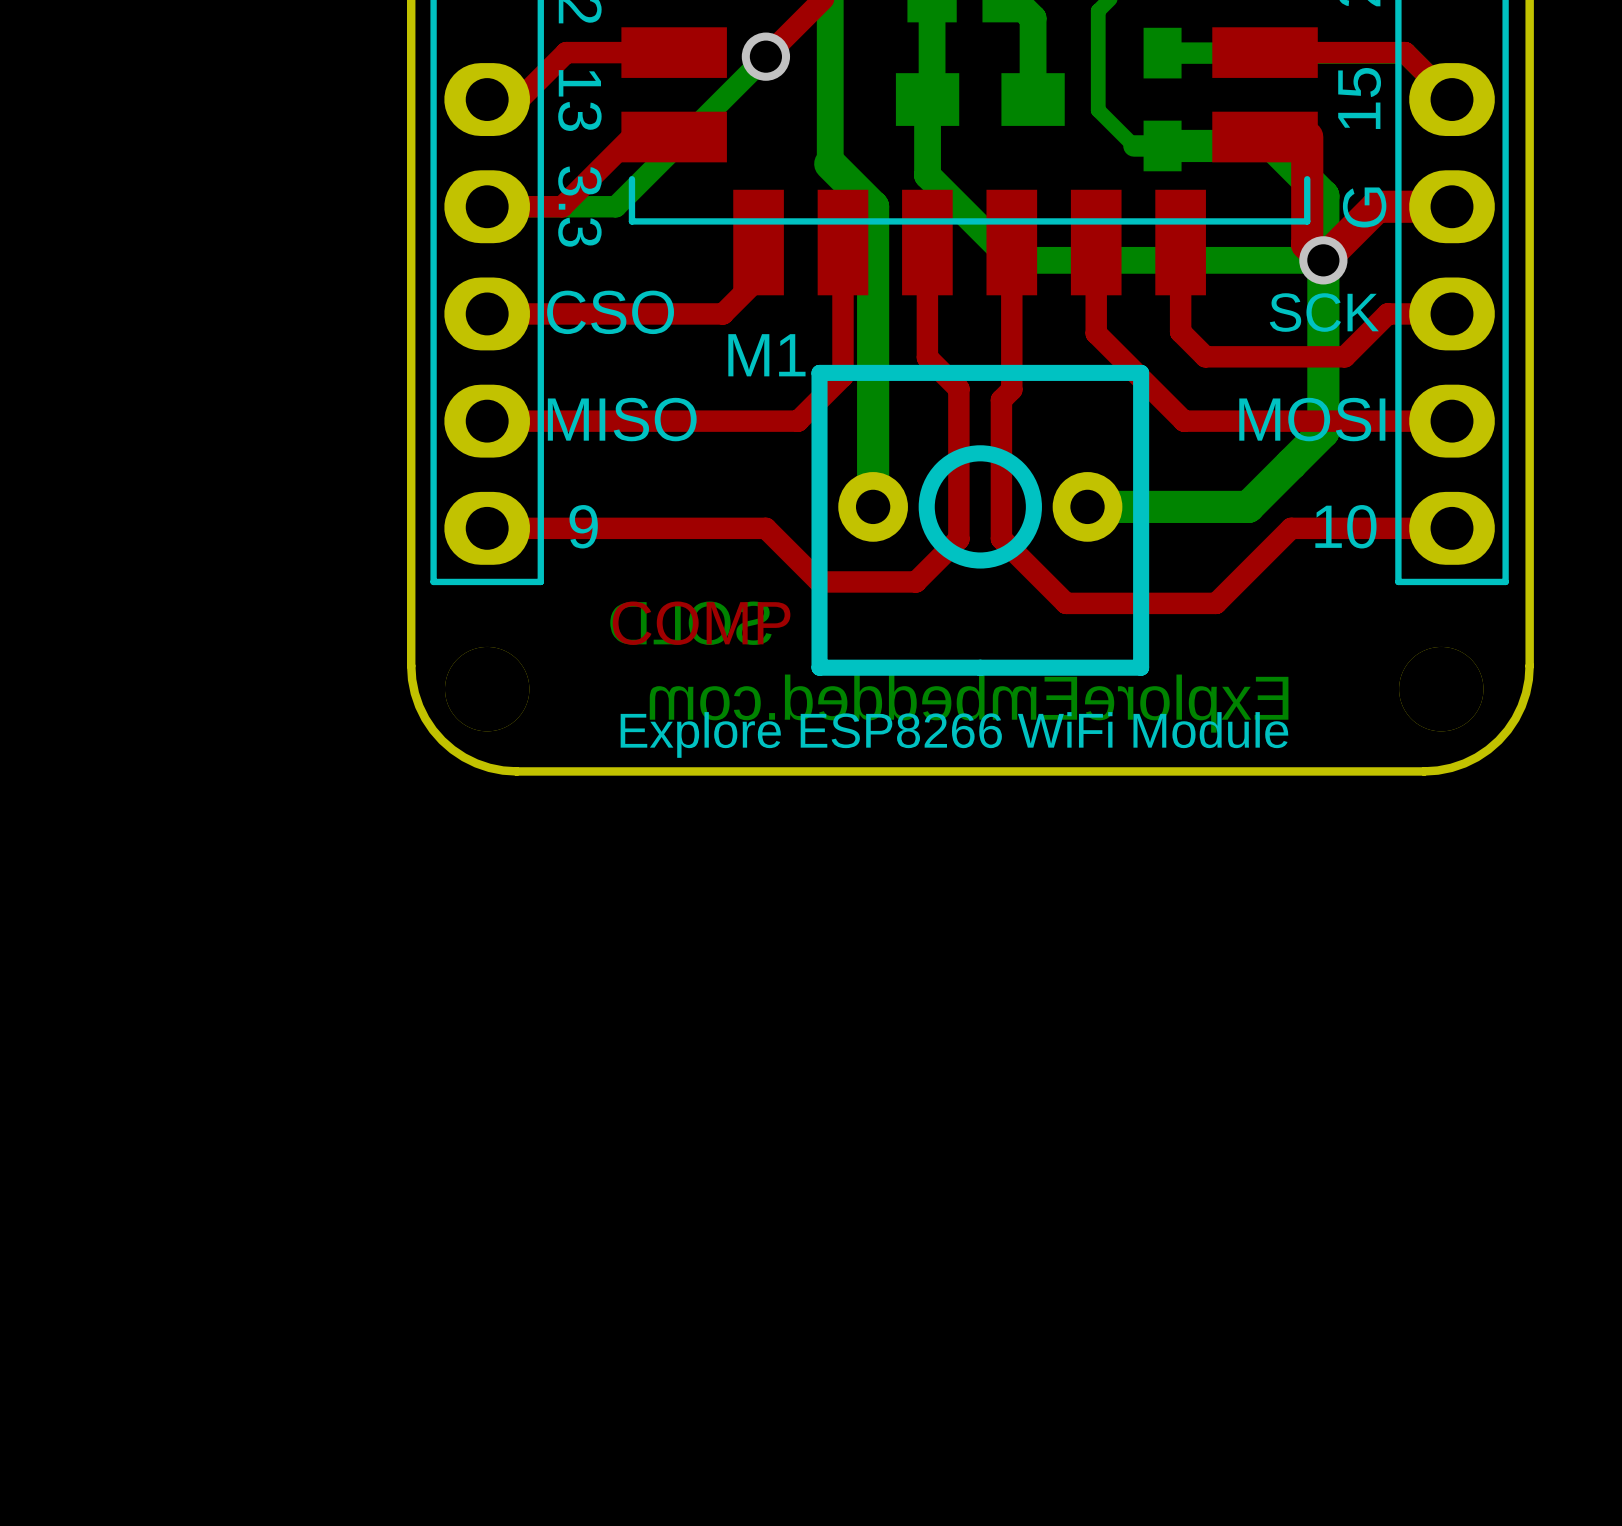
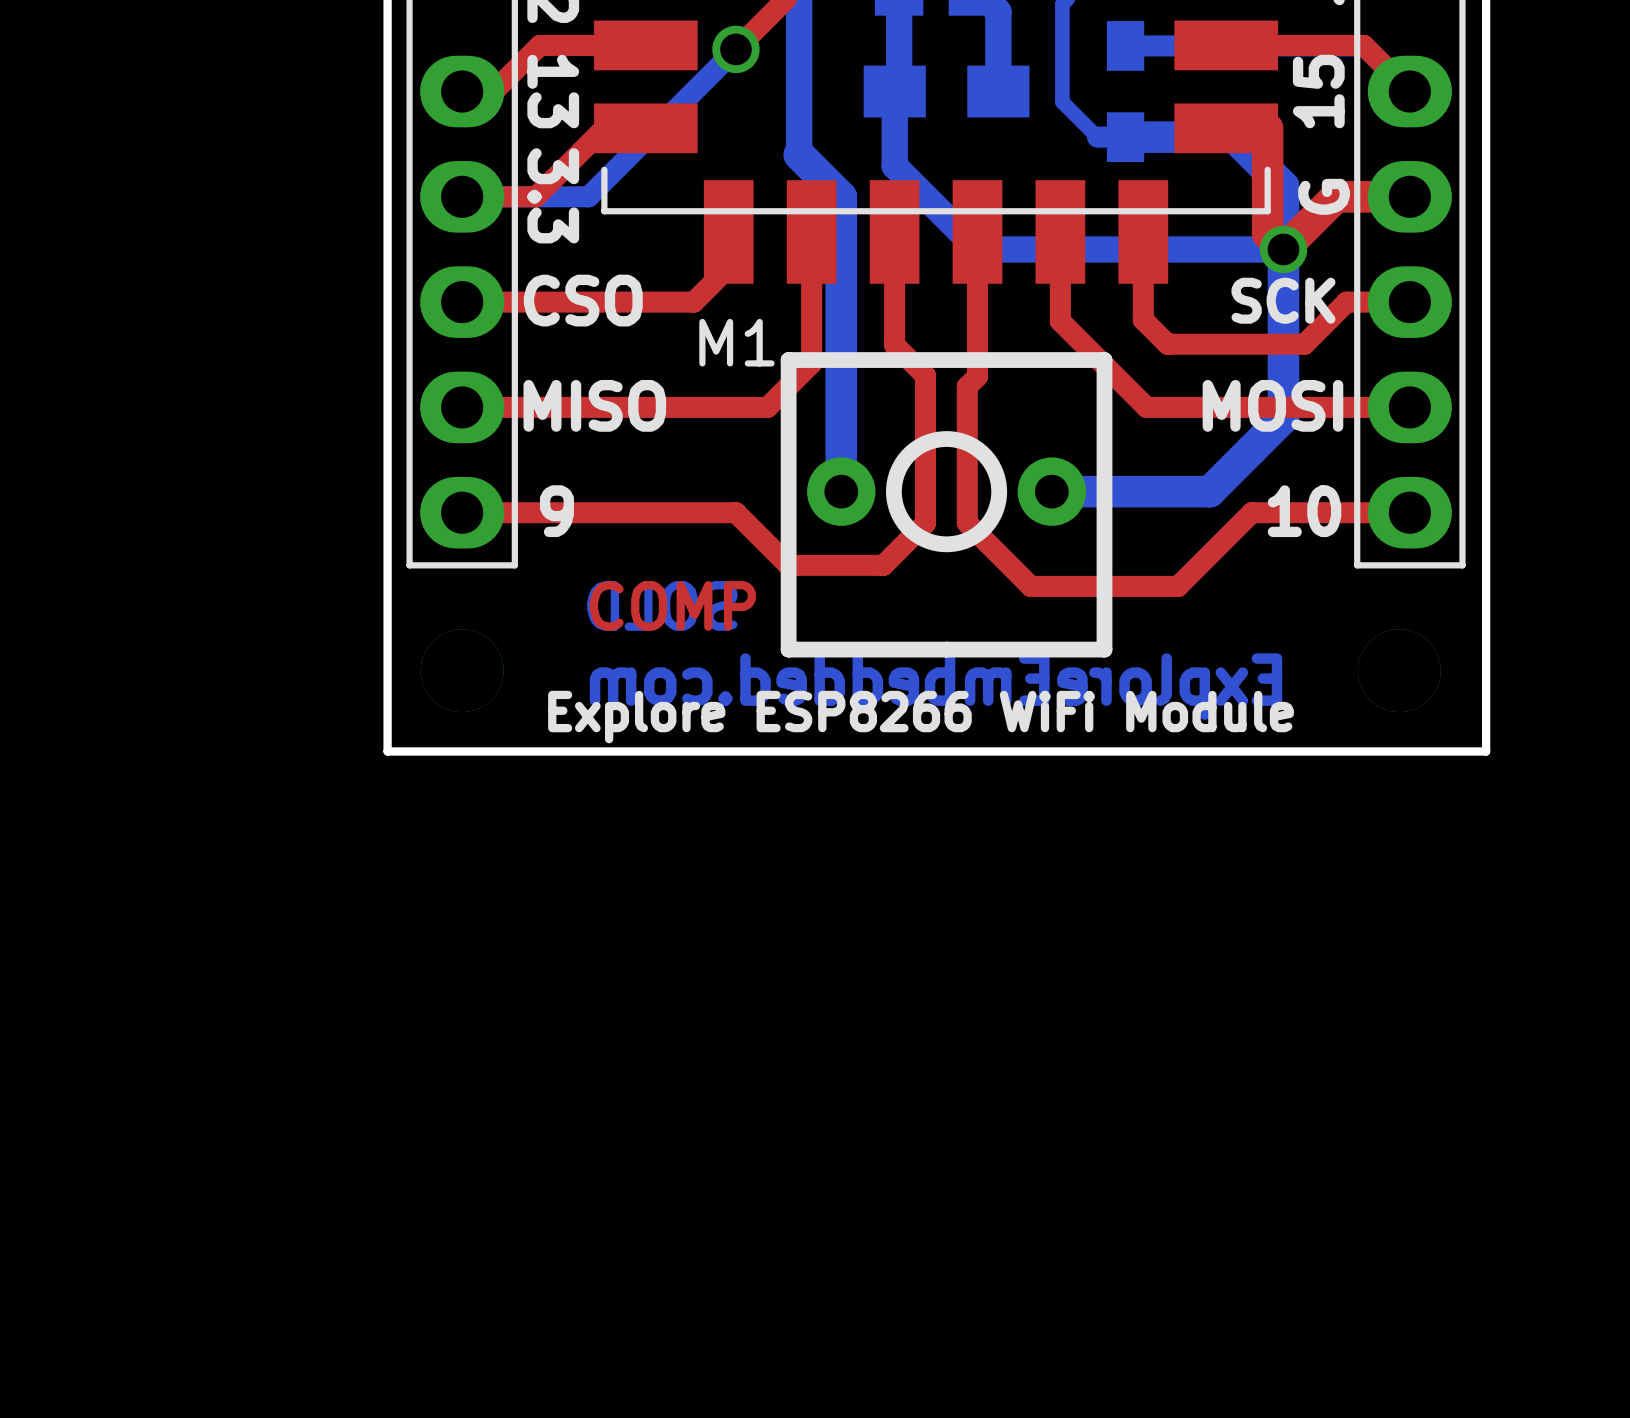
board edge: (411, 665) (412, 679) (419, 706) (433, 730) (442, 740) (452, 749) (476, 763) (502, 770) (516, 771) -> (387, 647) (387, 751) (491, 751)
board edge: (1529, 665) (1528, 679) (1521, 706) (1515, 718) (1498, 740) (1488, 749) (1464, 763) (1437, 770) (1424, 771) -> (1486, 647) (1486, 751) (1382, 751)

